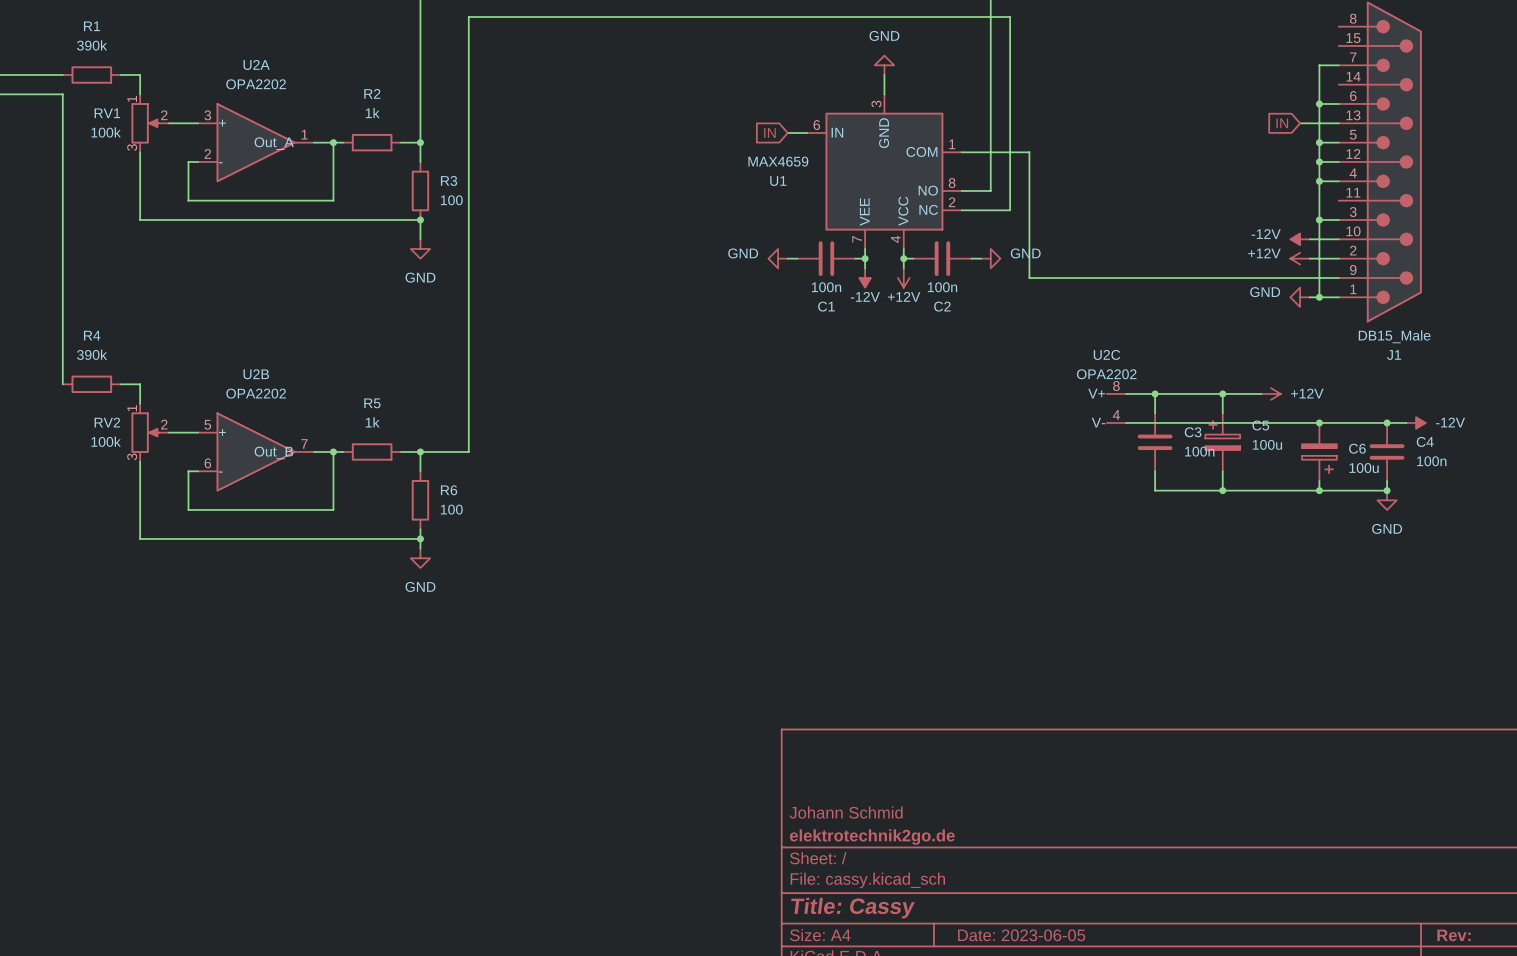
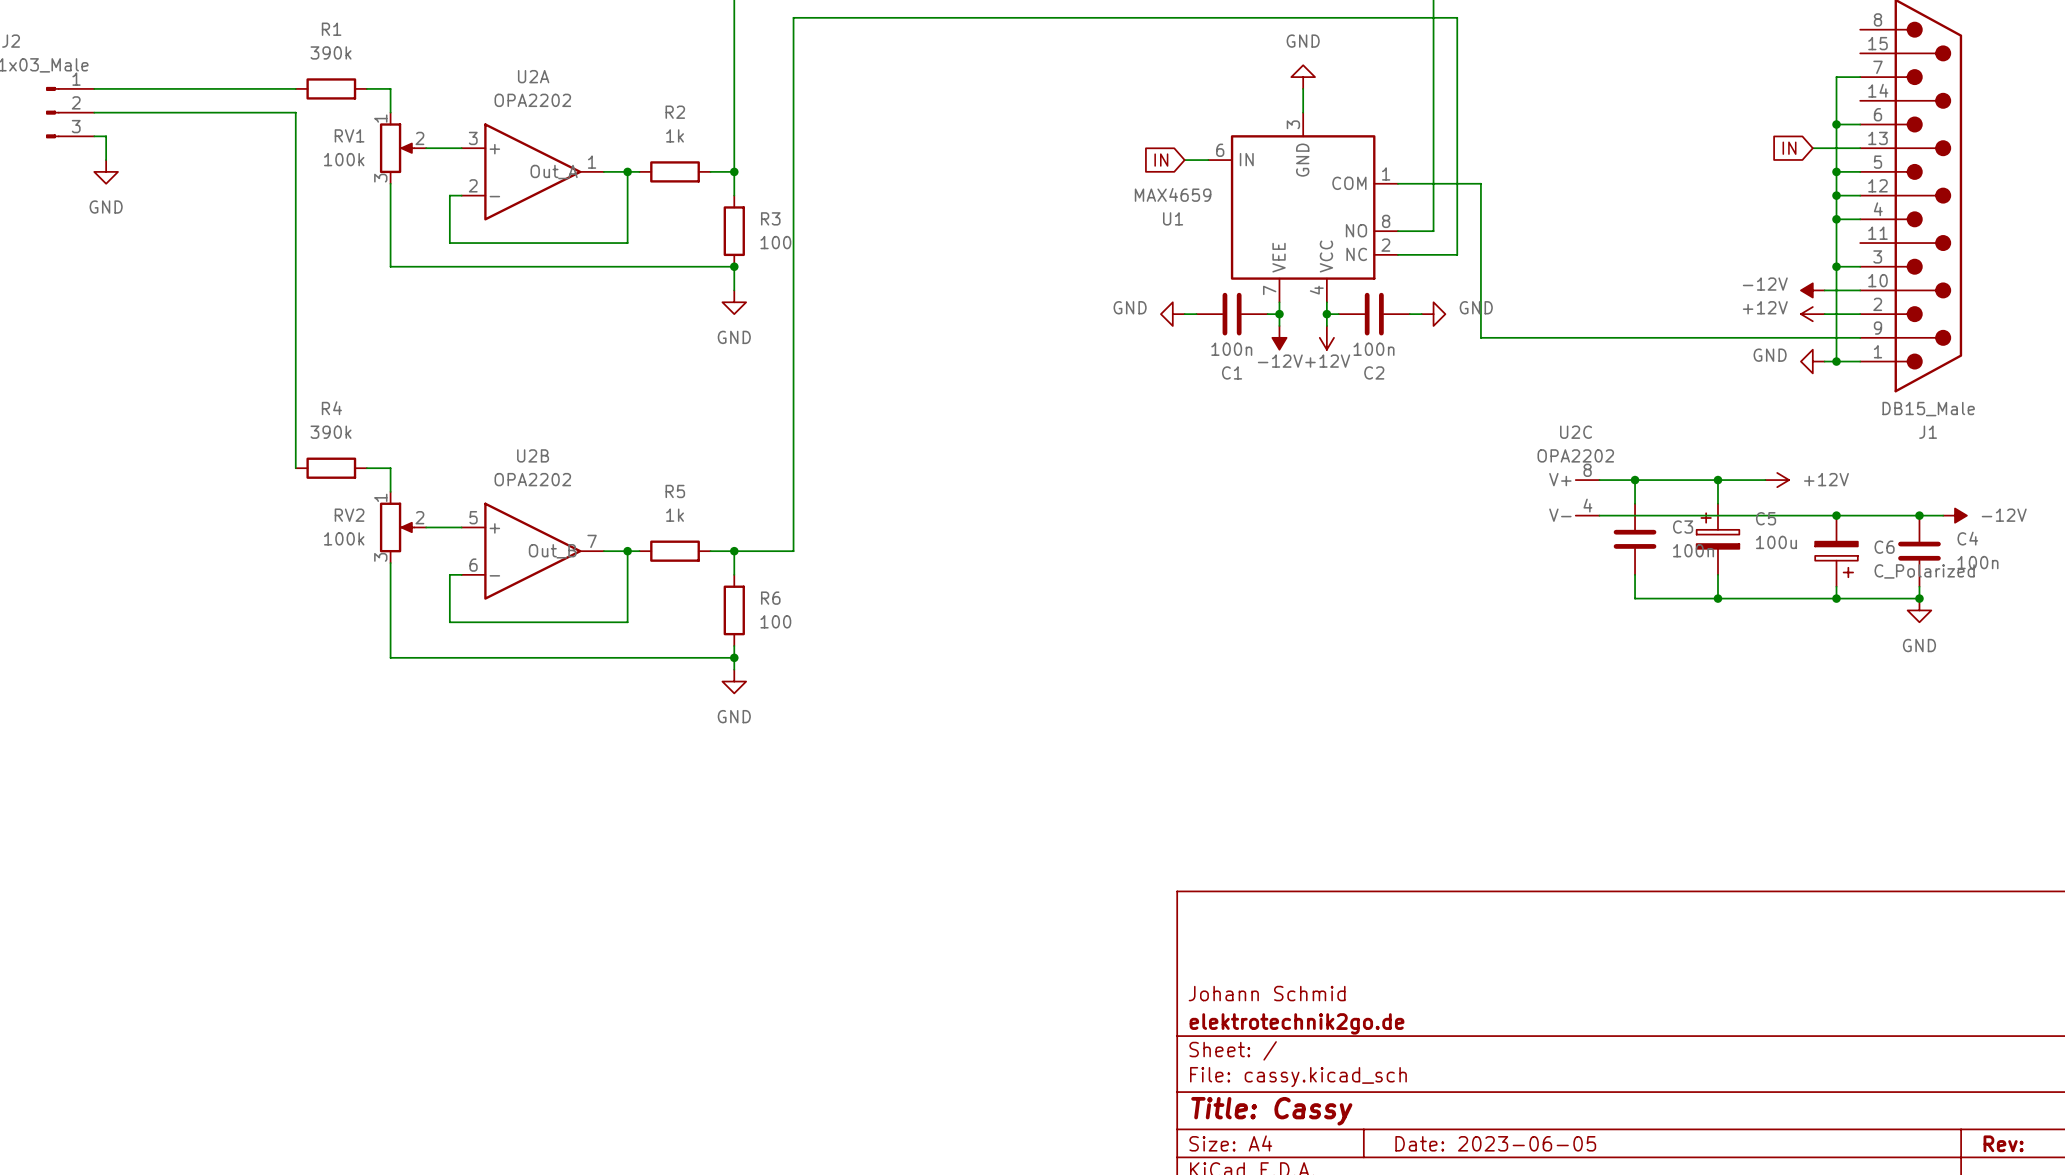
C6 value: 100u (1364, 468) -> C_Polarized (1924, 571)

